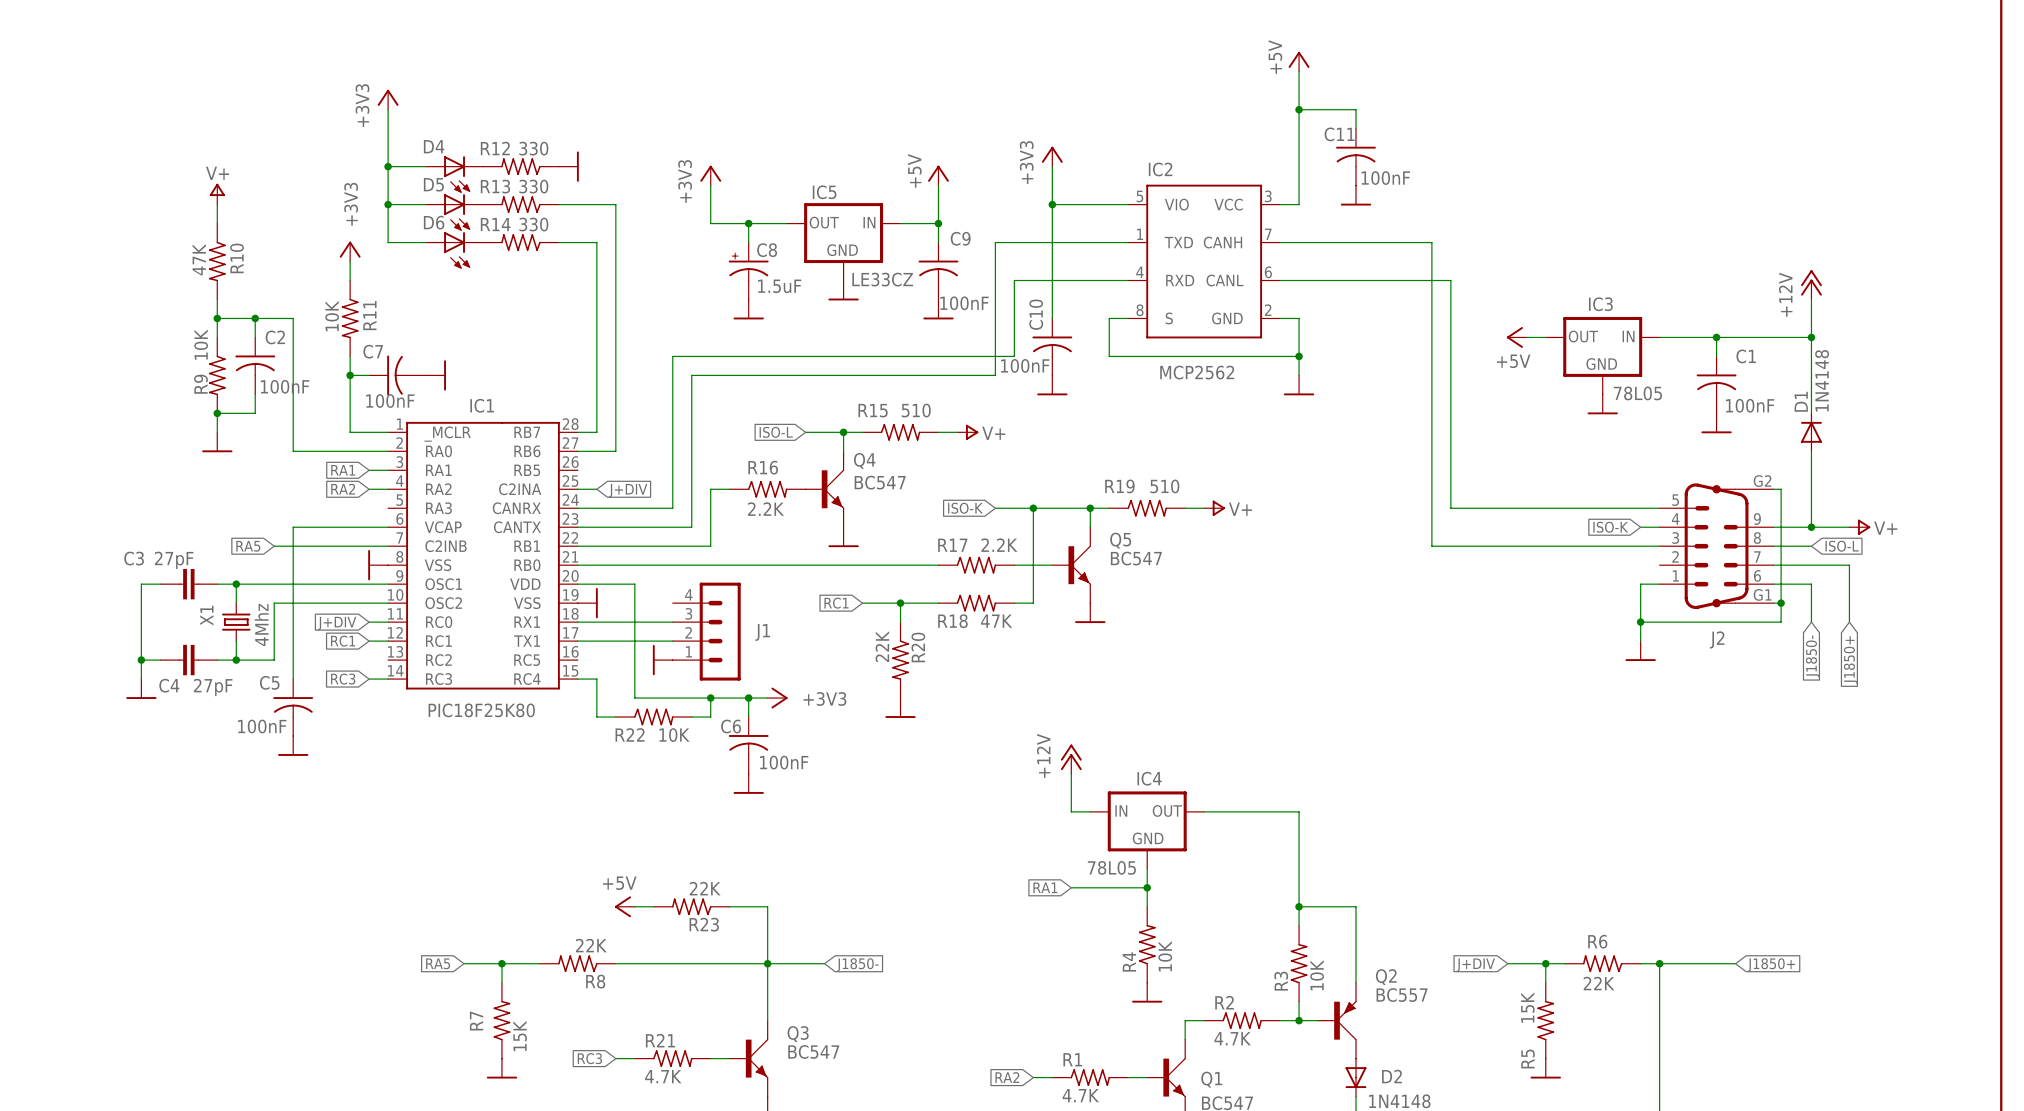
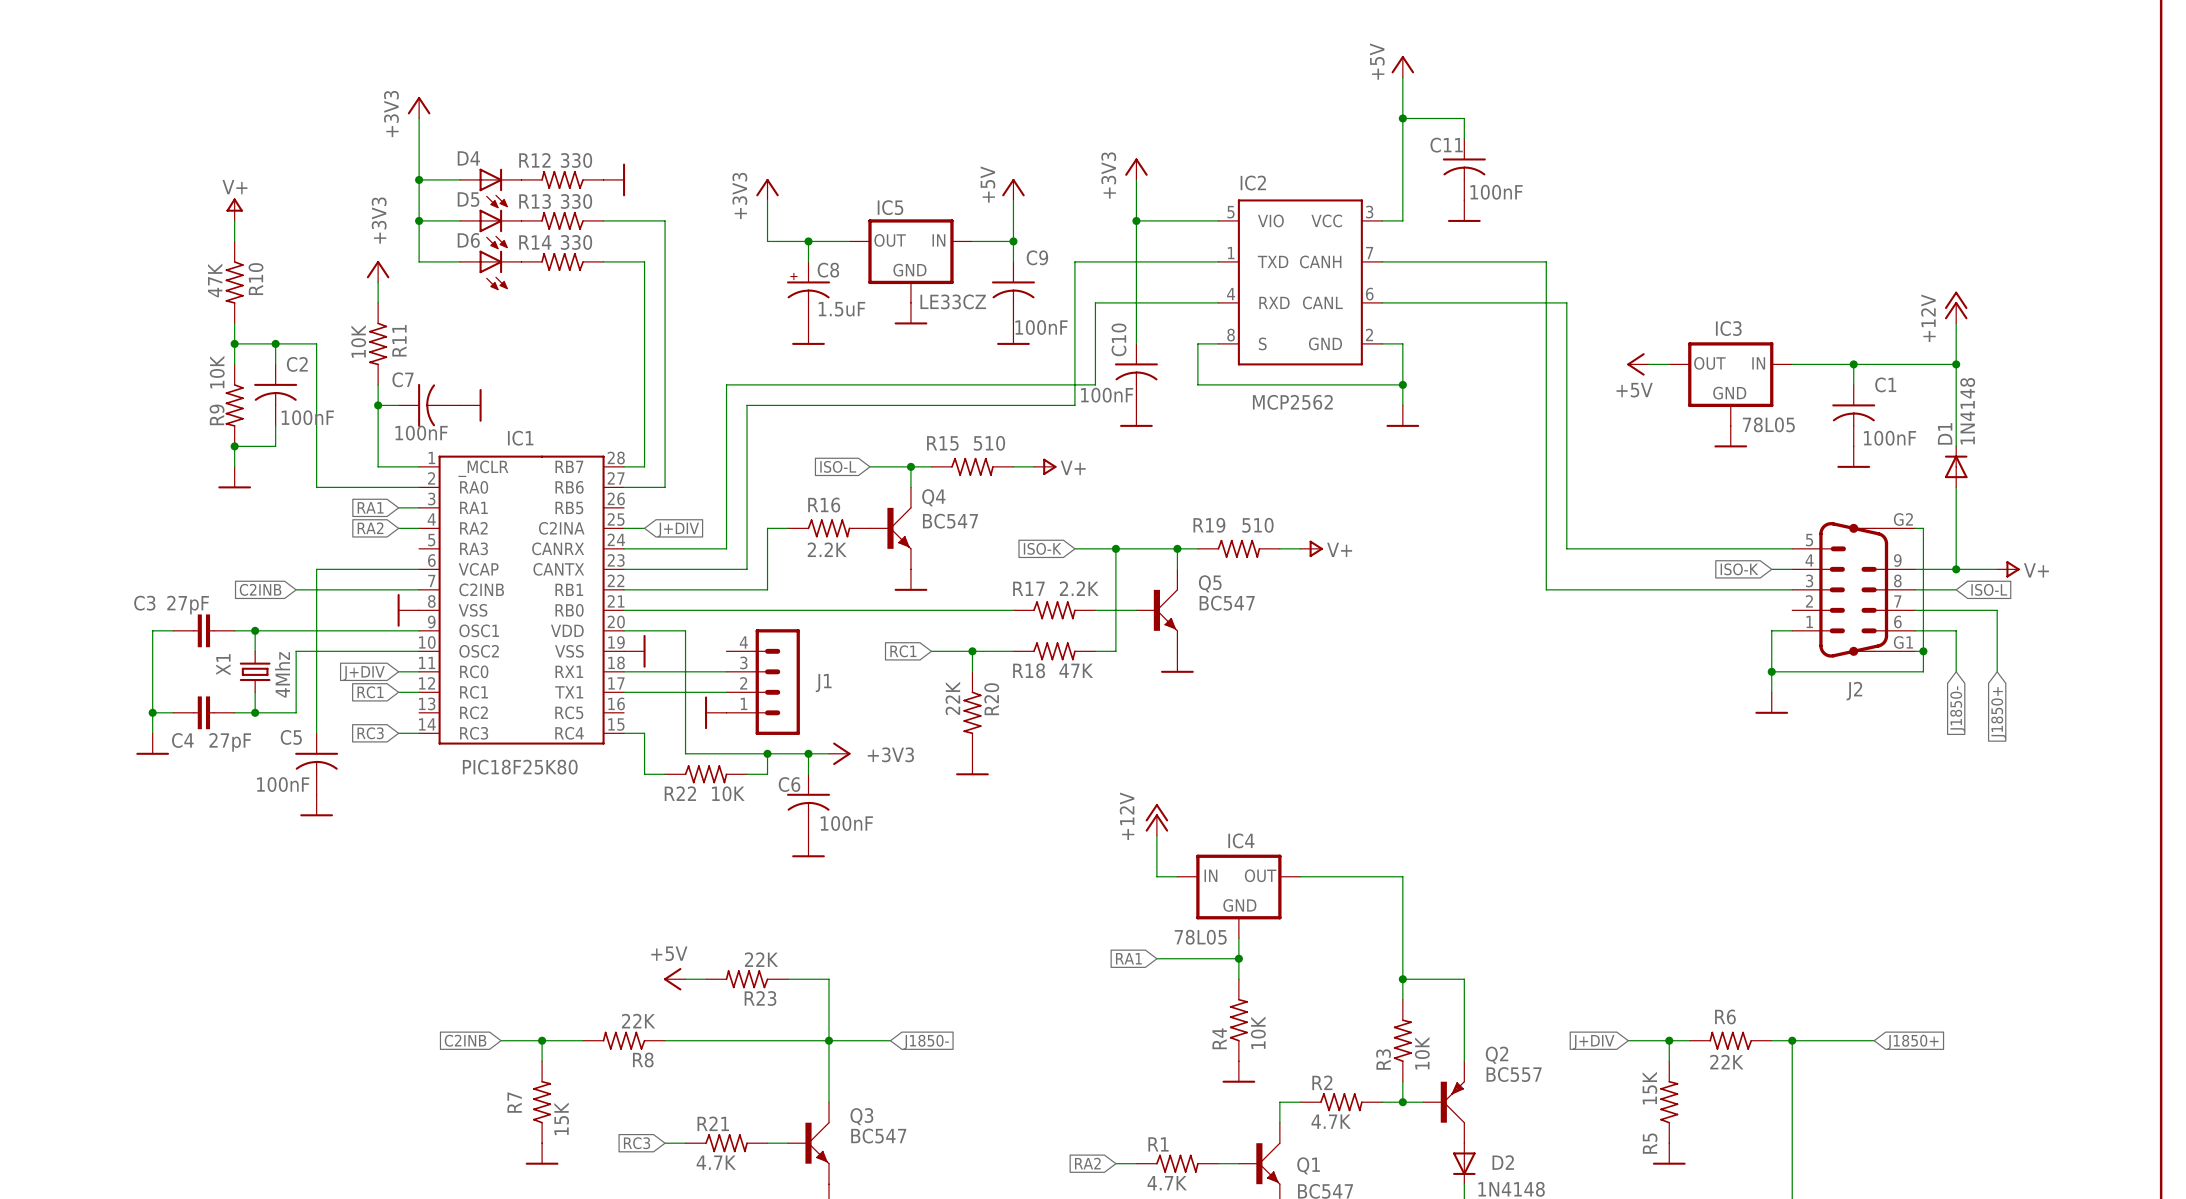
global label: RA5 (248, 546) -> C2INB (260, 589)
global label: RA5 (438, 963) -> C2INB (465, 1040)

